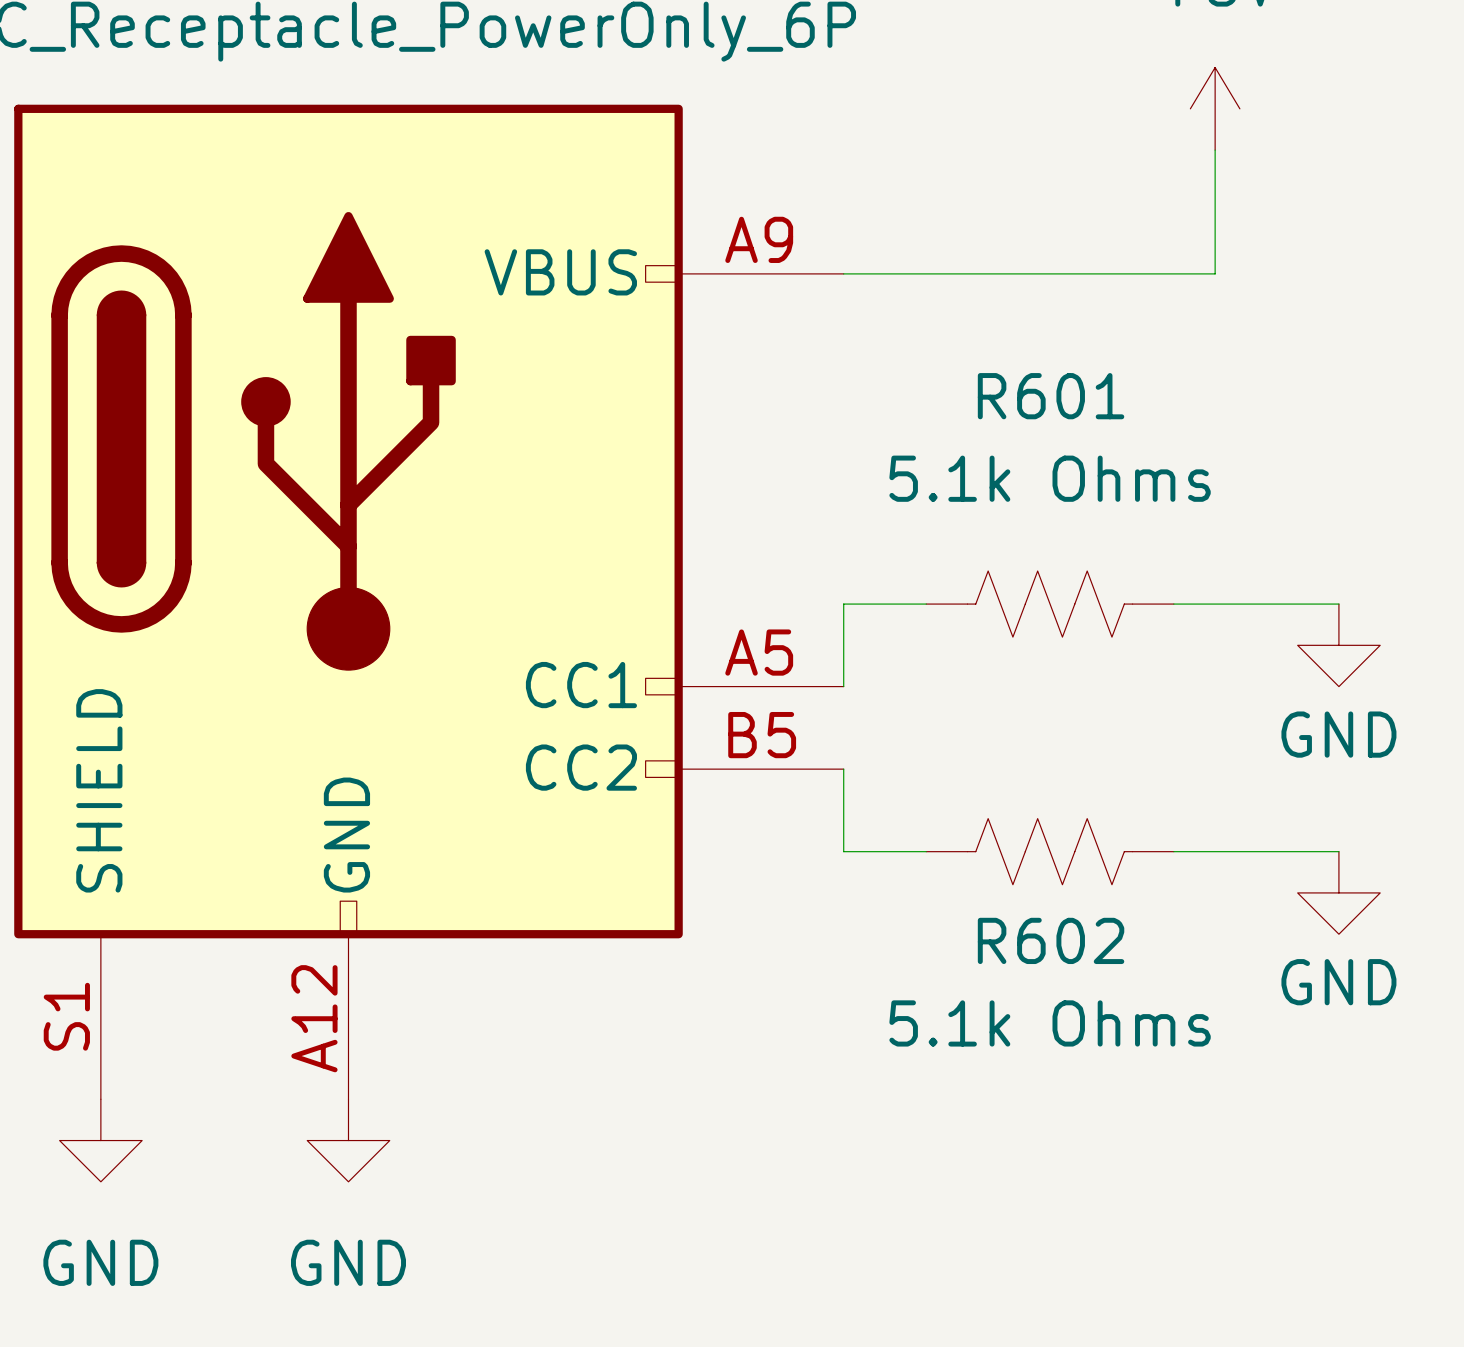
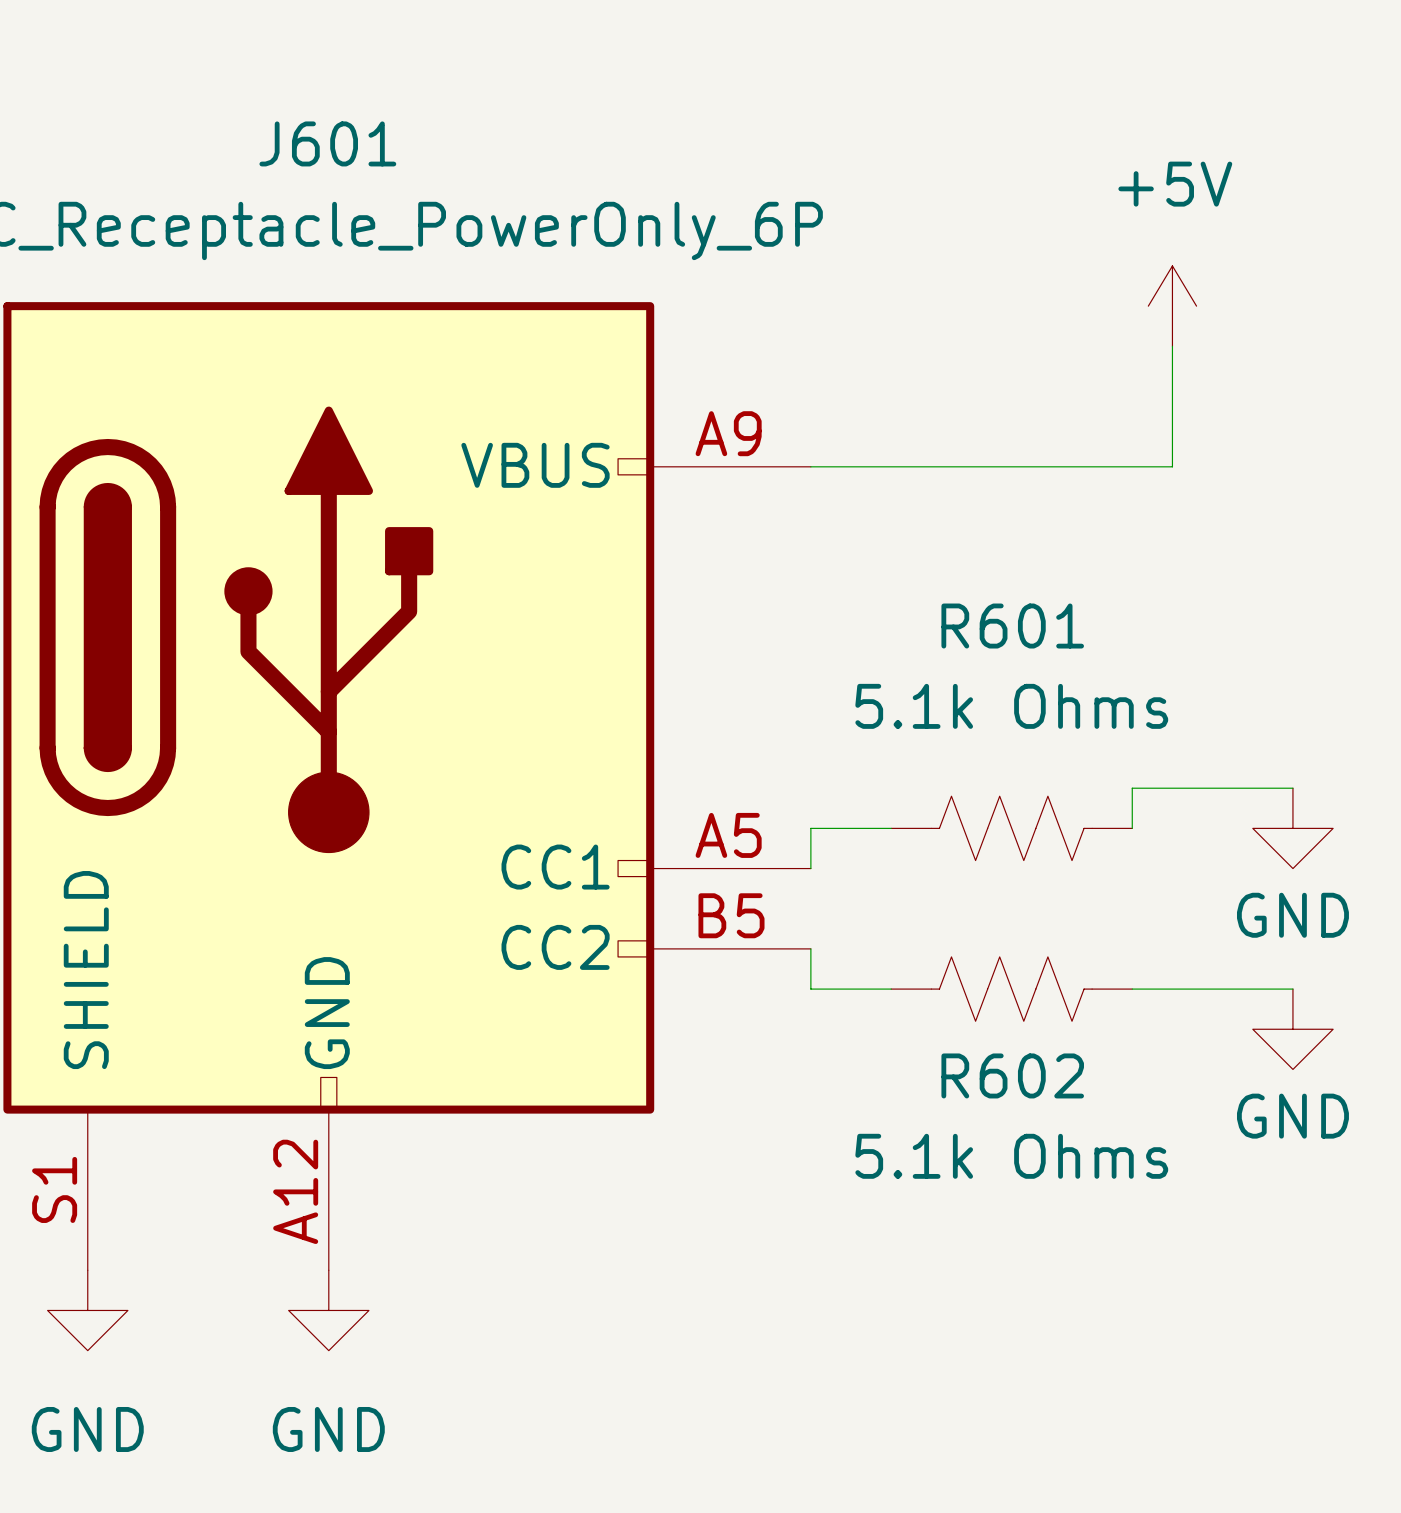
wire: (926, 604) (843, 604) (843, 645) -> (891, 828) (810, 828)
R601 position: (1050, 604) -> (1011, 828)
wire: none -> (1132, 788) (1132, 828)
wire: (843, 810) (843, 851) (926, 851) -> (810, 989) (891, 989)
R602 position: (1050, 851) -> (1011, 989)
wire: (1173, 851) (1338, 851) -> (1132, 989) (1292, 989)
power symbol position: GND (1338, 892) -> GND (1292, 1029)

